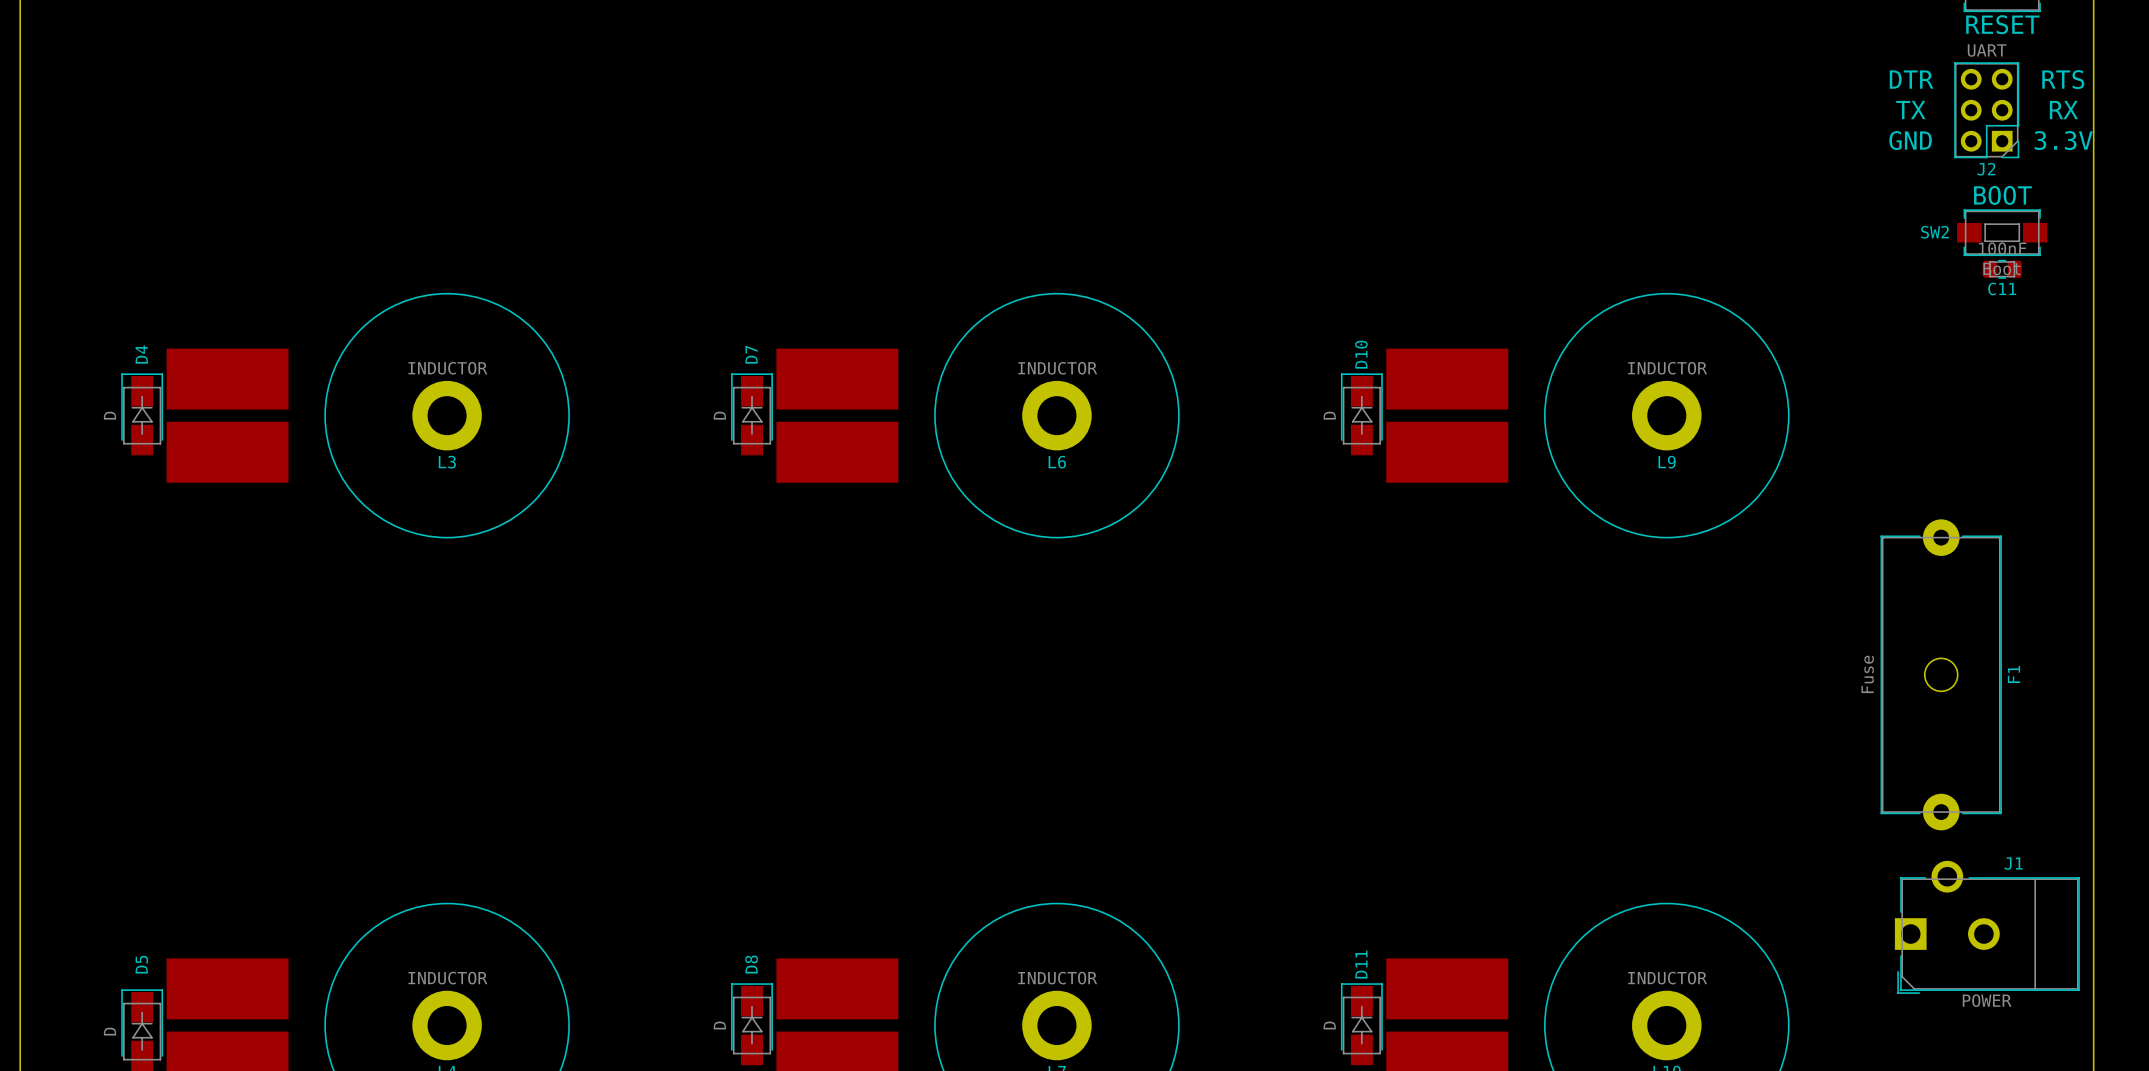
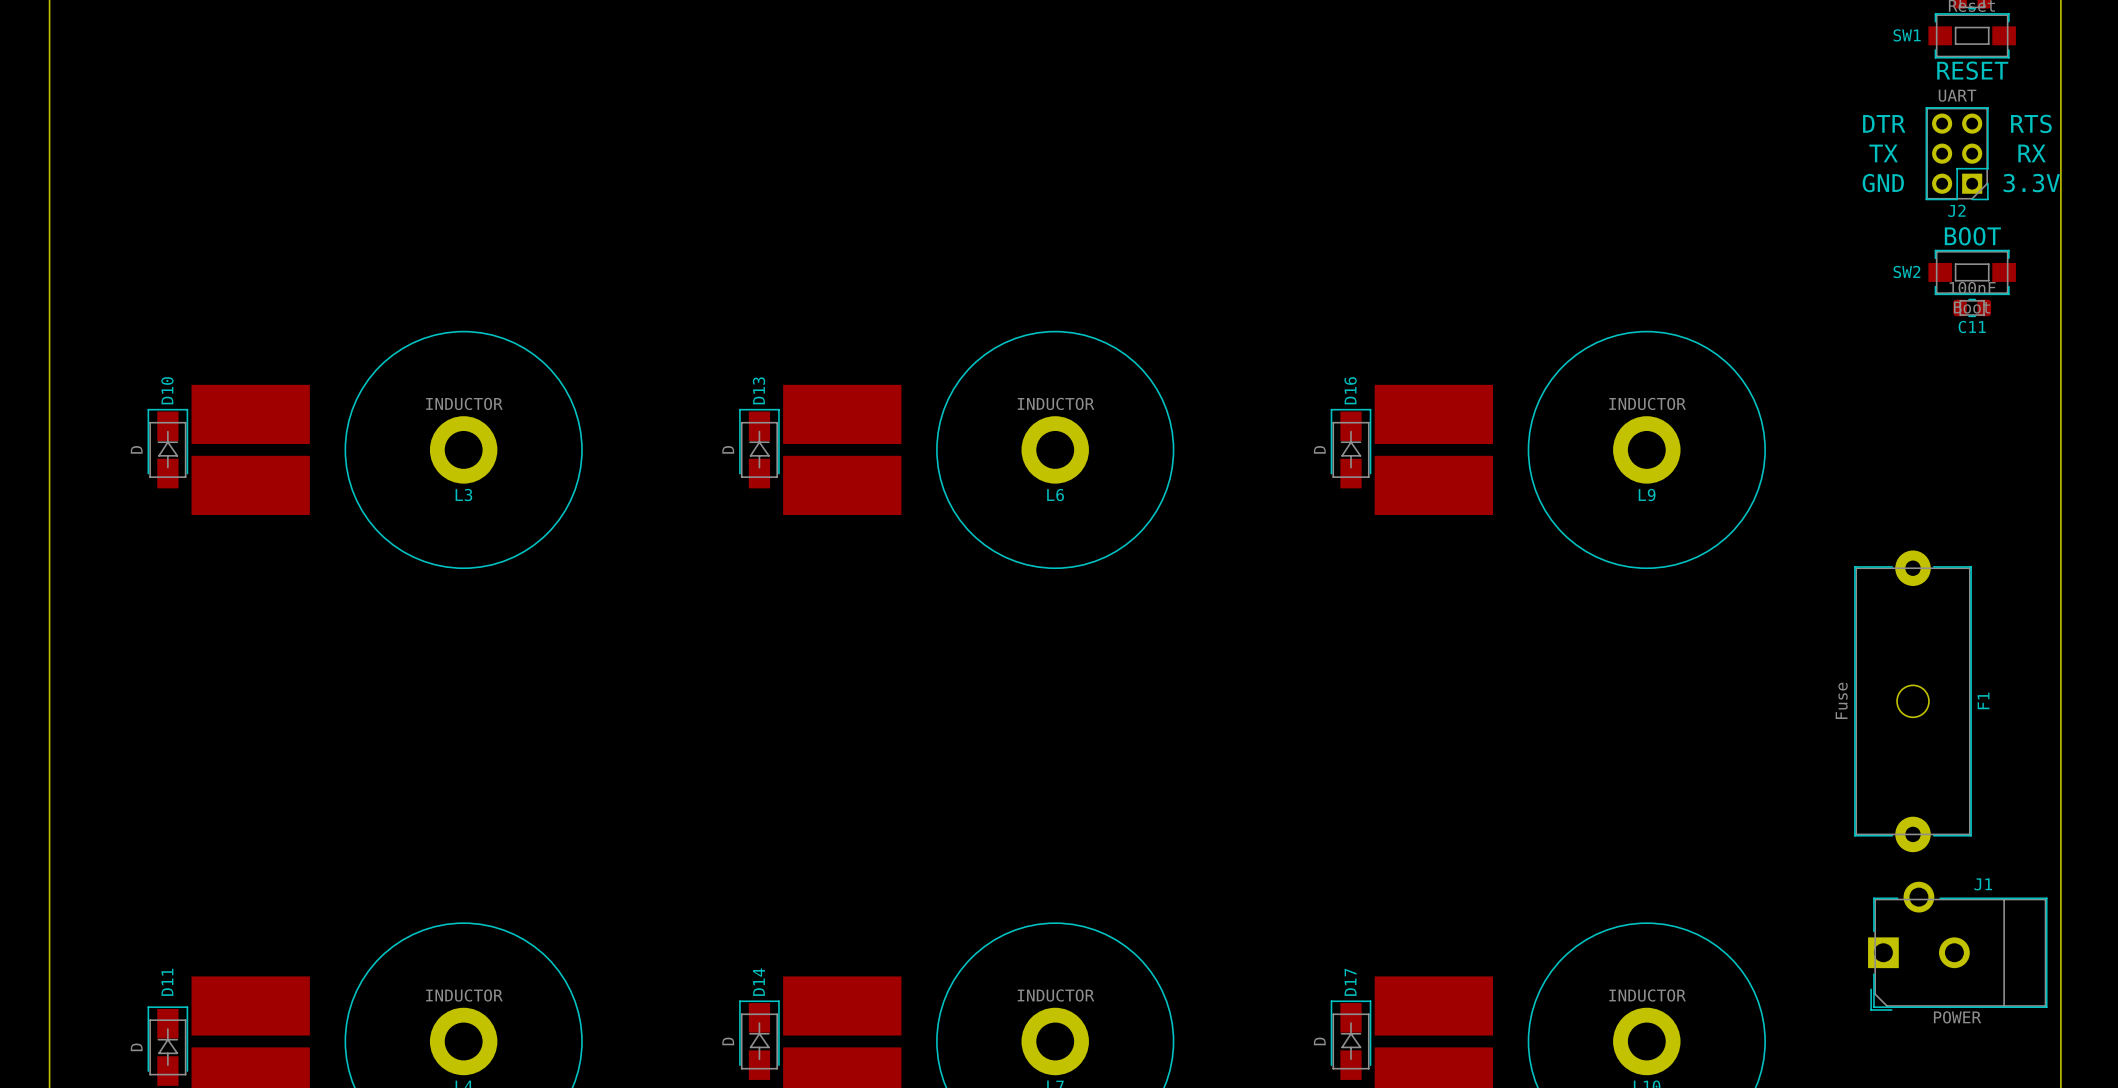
D4 name: D4 (141, 354) -> D10 (167, 390)
D7 name: D7 (751, 354) -> D13 (759, 390)
D10 name: D10 (1361, 354) -> D16 (1350, 390)
D5 name: D5 (141, 964) -> D11 (167, 982)
D8 name: D8 (751, 964) -> D14 (759, 982)
D11 name: D11 (1361, 964) -> D17 (1350, 982)

